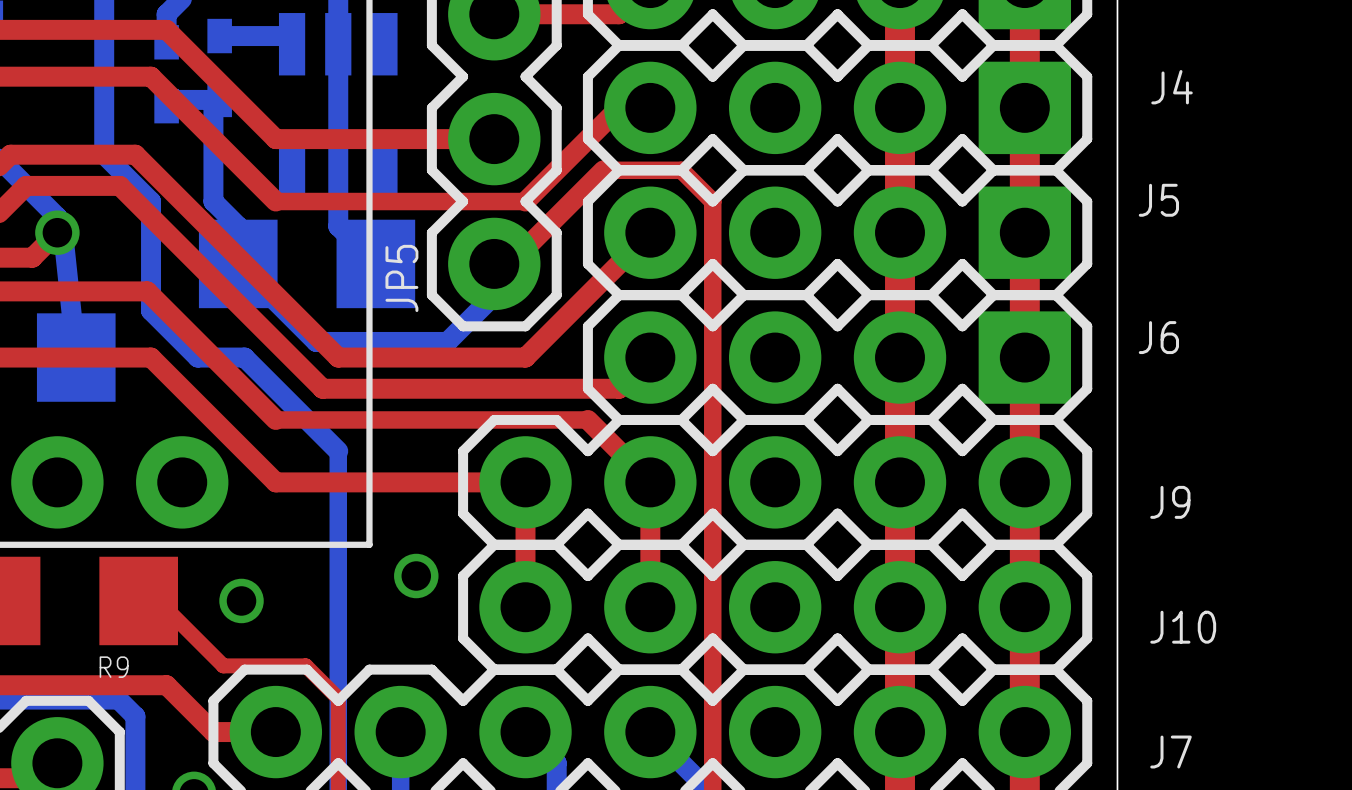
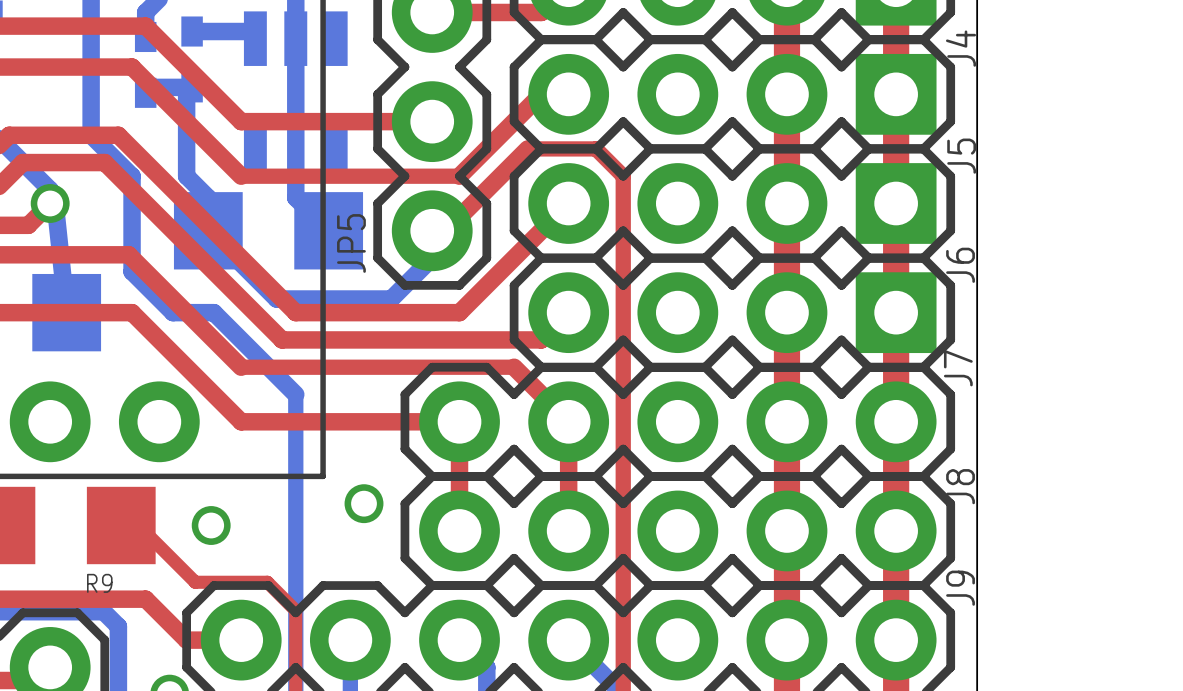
J4 name rotation: 0° (1172, 87) -> 90° counterclockwise (961, 48)
J4 name position: J4 (1172, 87) -> J4 (961, 48)
J5 name rotation: 0° (1158, 200) -> 90° counterclockwise (961, 156)
J6 name rotation: 0° (1158, 337) -> 90° counterclockwise (960, 265)
J9 name: J9 (1170, 502) -> J7 (958, 368)
J10 name: J10 (1183, 627) -> J8 (960, 486)
J7 name: J7 (1171, 752) -> J9 (960, 588)

